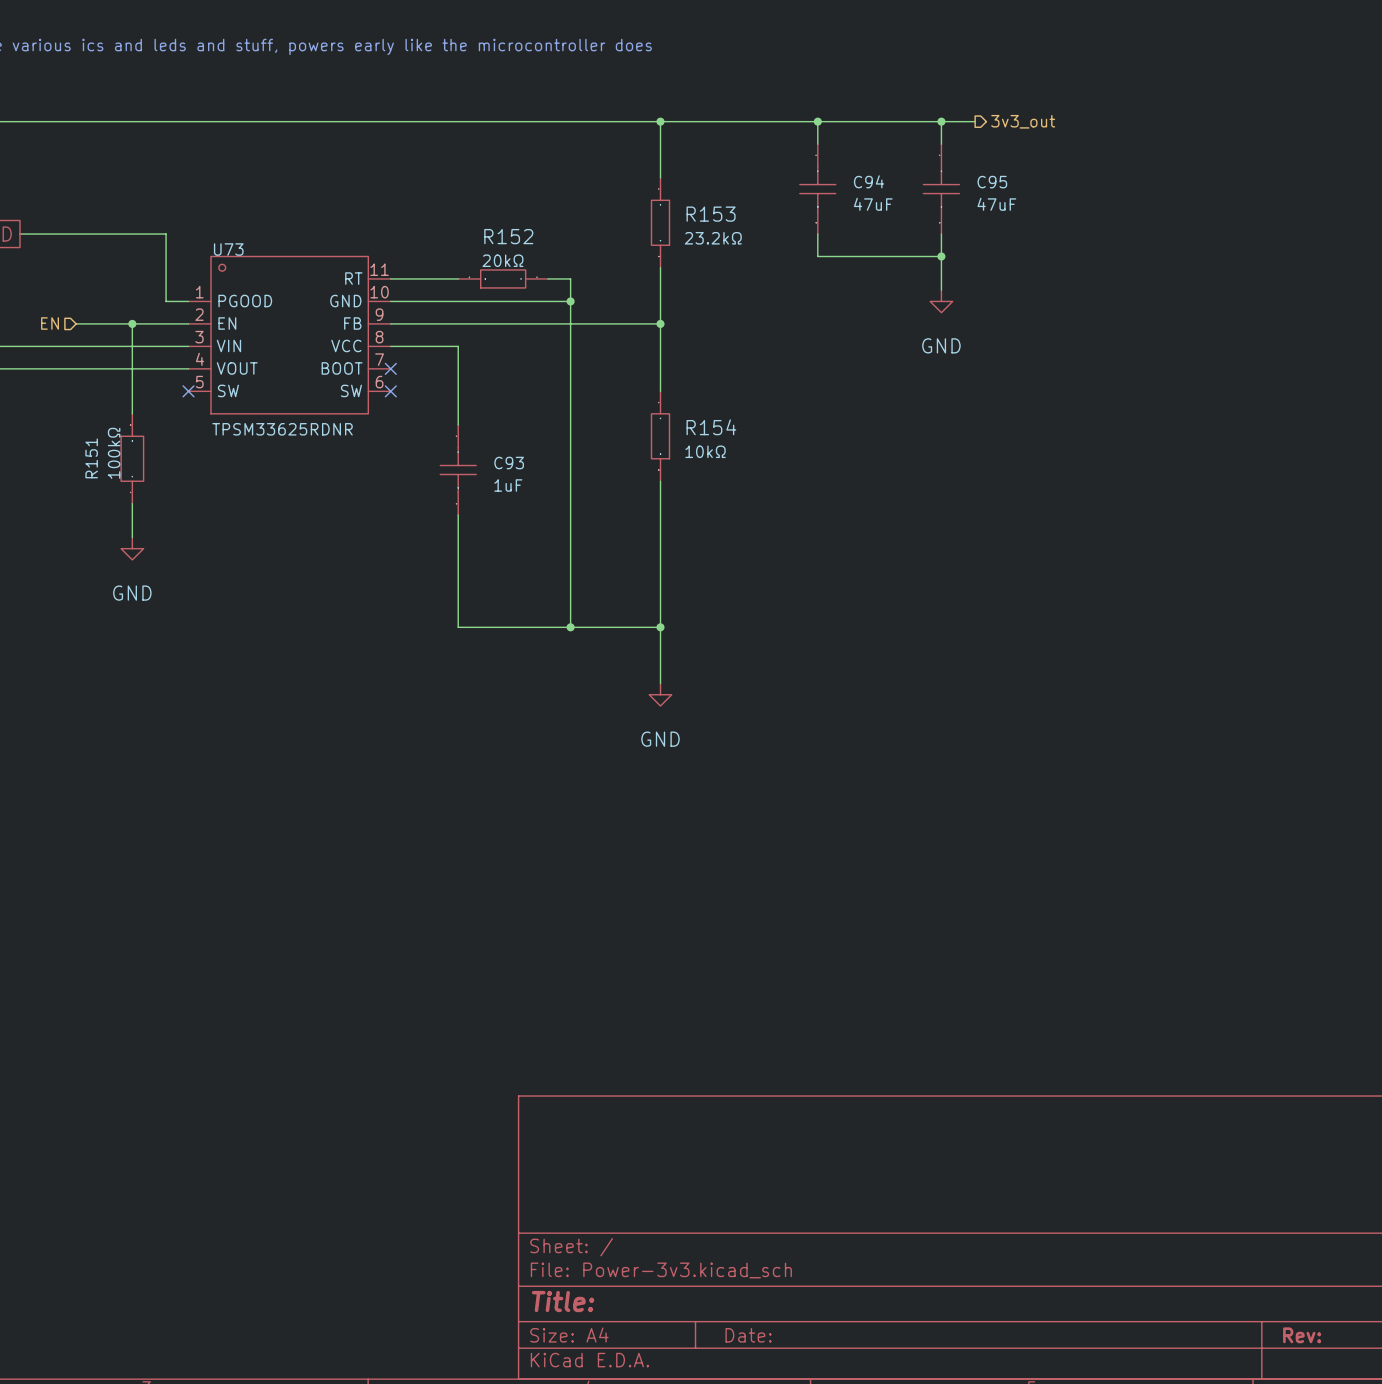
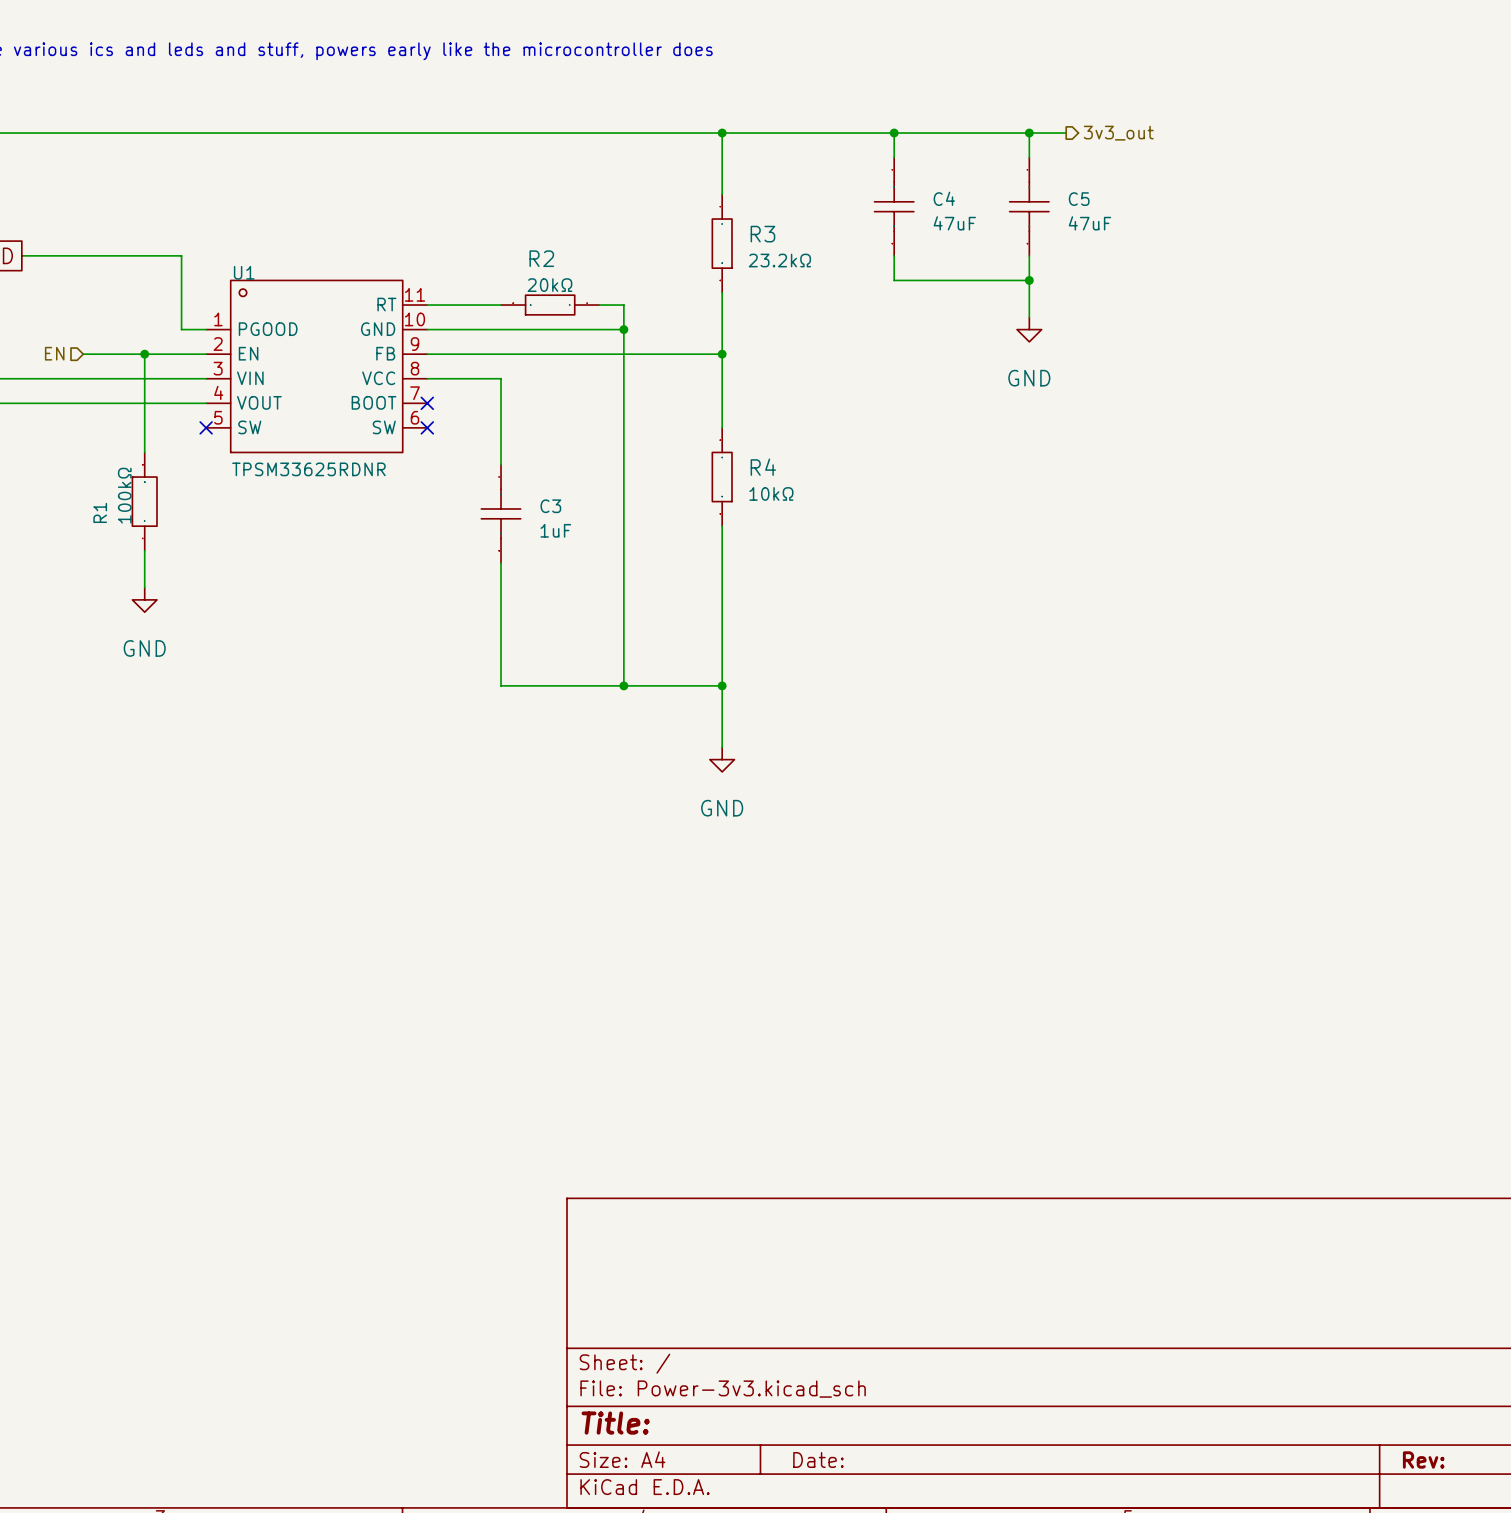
C94 name: C94 (869, 181) -> C4 (944, 198)
C95 name: C95 (992, 182) -> C5 (1079, 199)
R153 name: R153 (711, 214) -> R3 (762, 234)
R152 name: R152 (508, 236) -> R2 (541, 258)
U73 name: U73 (228, 249) -> U1 (244, 272)
R154 name: R154 (711, 427) -> R4 (763, 467)
R151 name: R151 (91, 458) -> R1 (100, 512)
C93 name: C93 (509, 463) -> C3 (550, 506)

